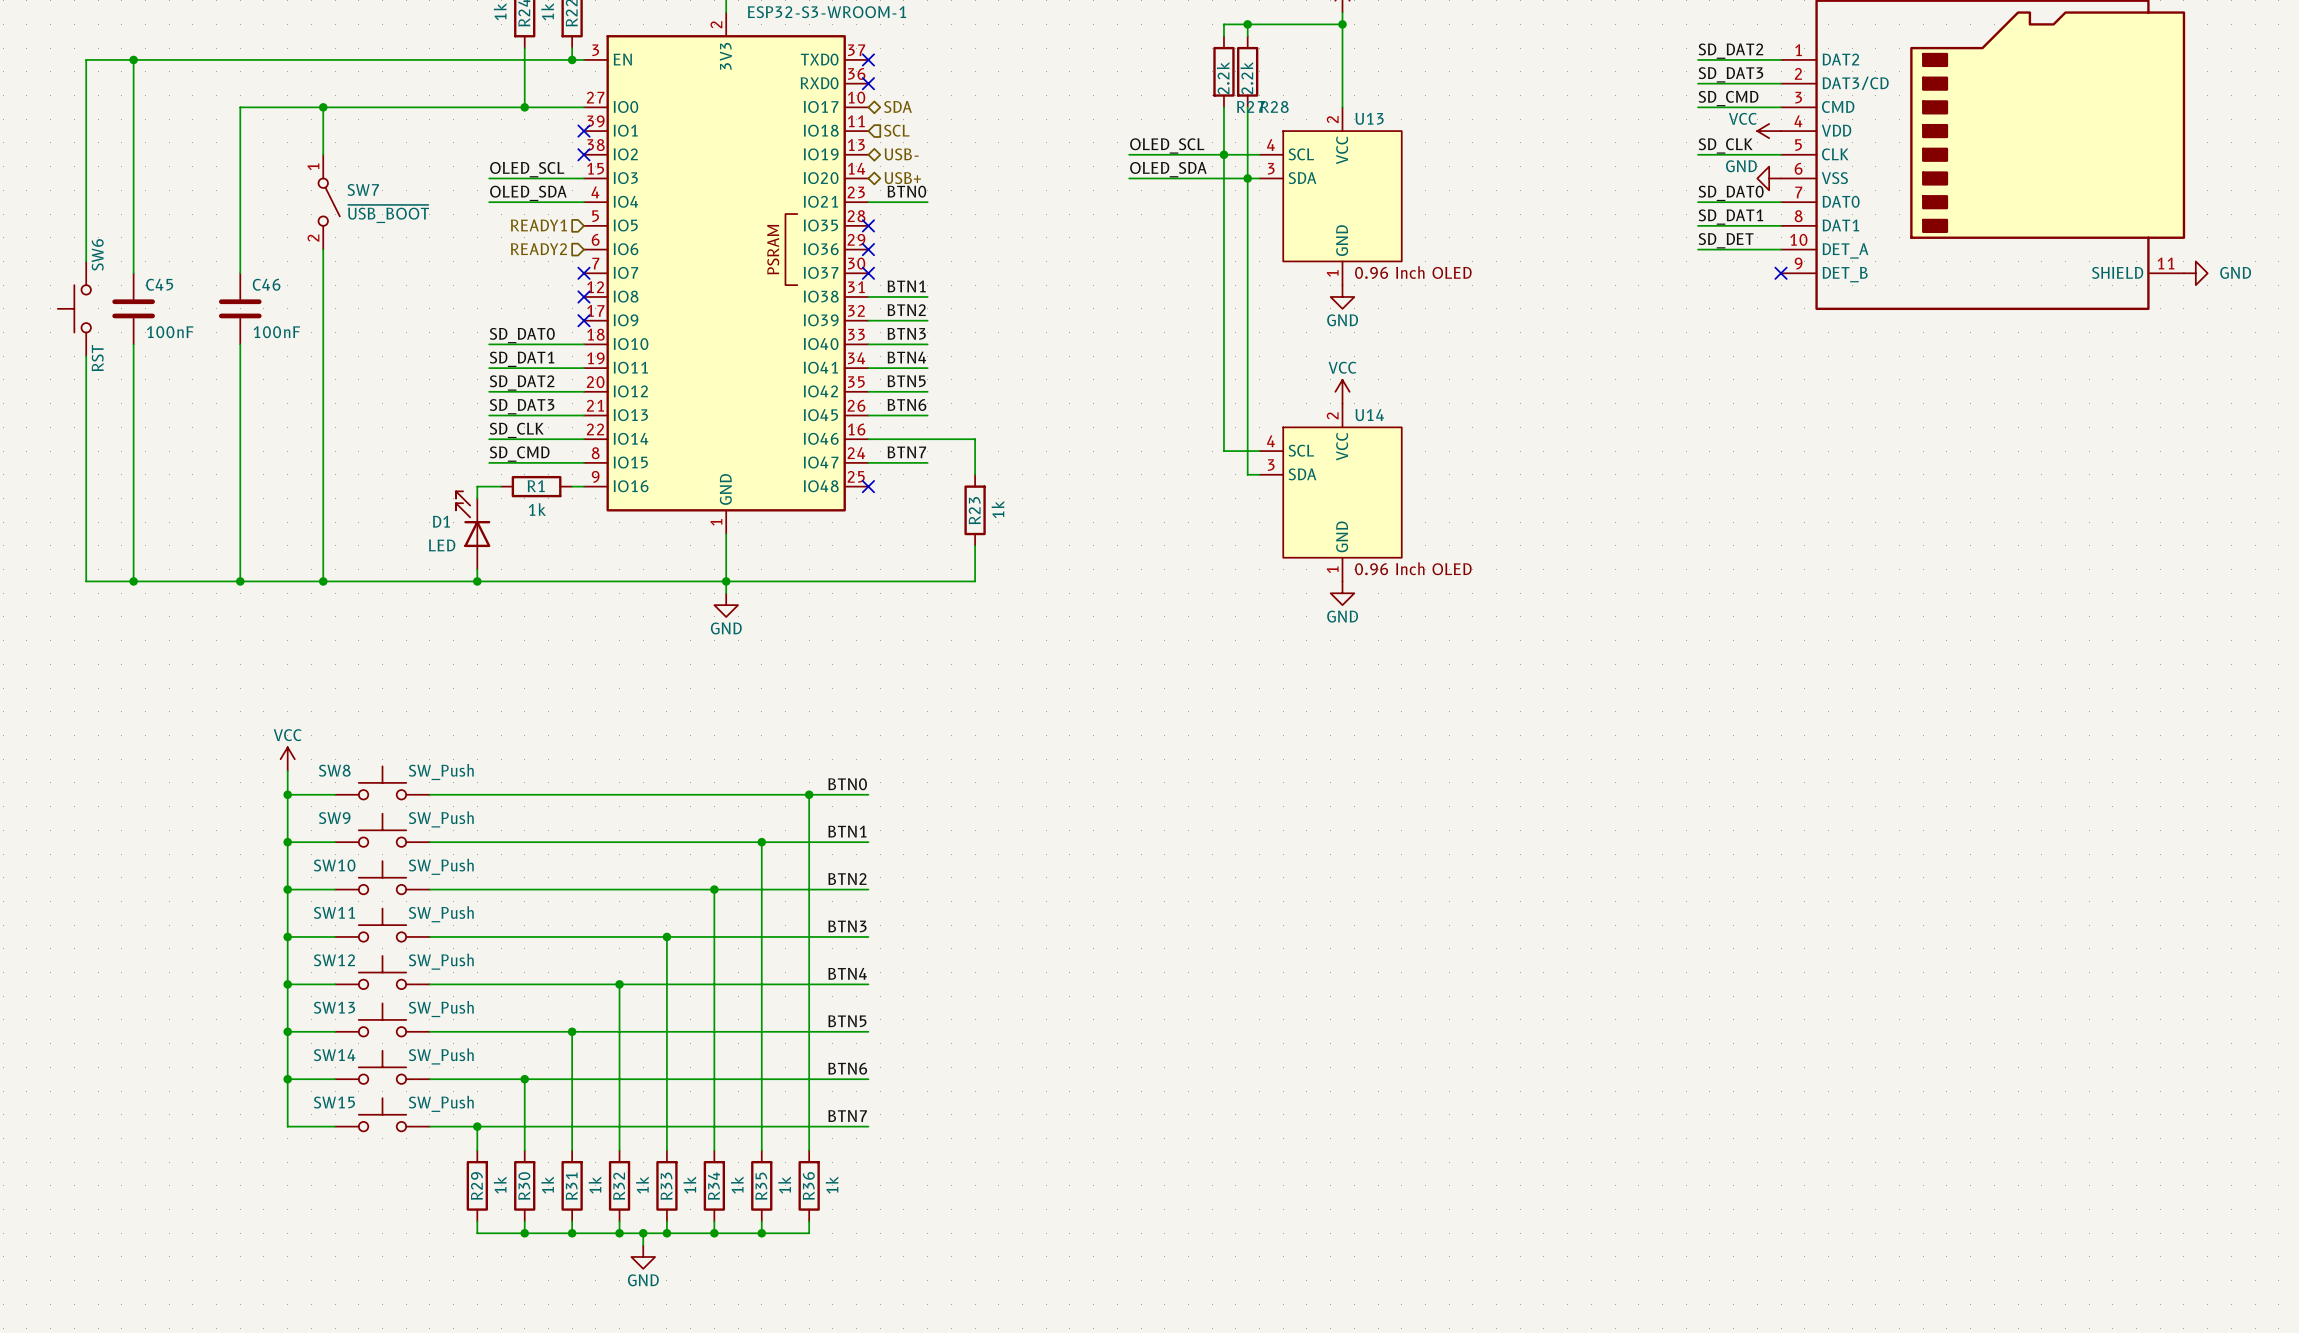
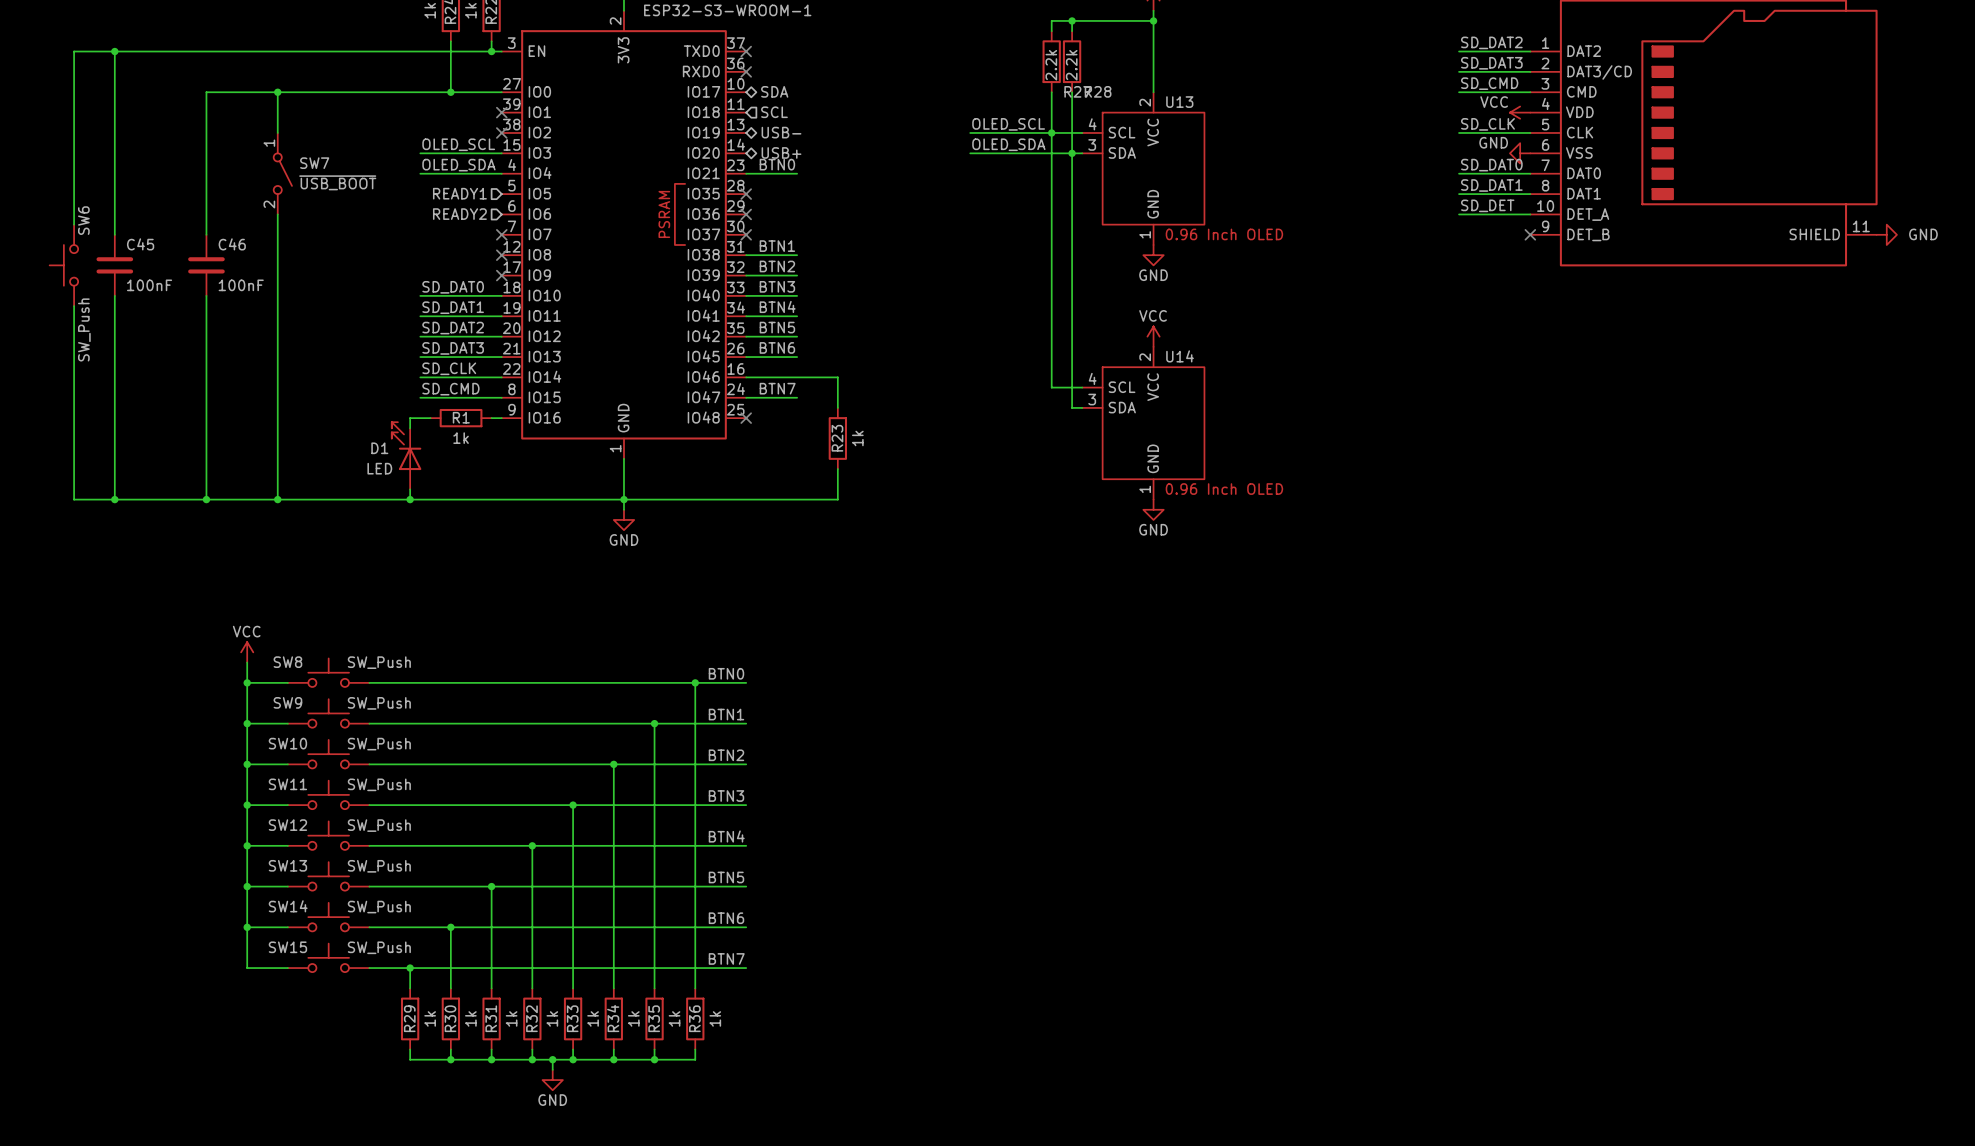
SW6 value: RST (97, 358) -> SW_Push (84, 329)

